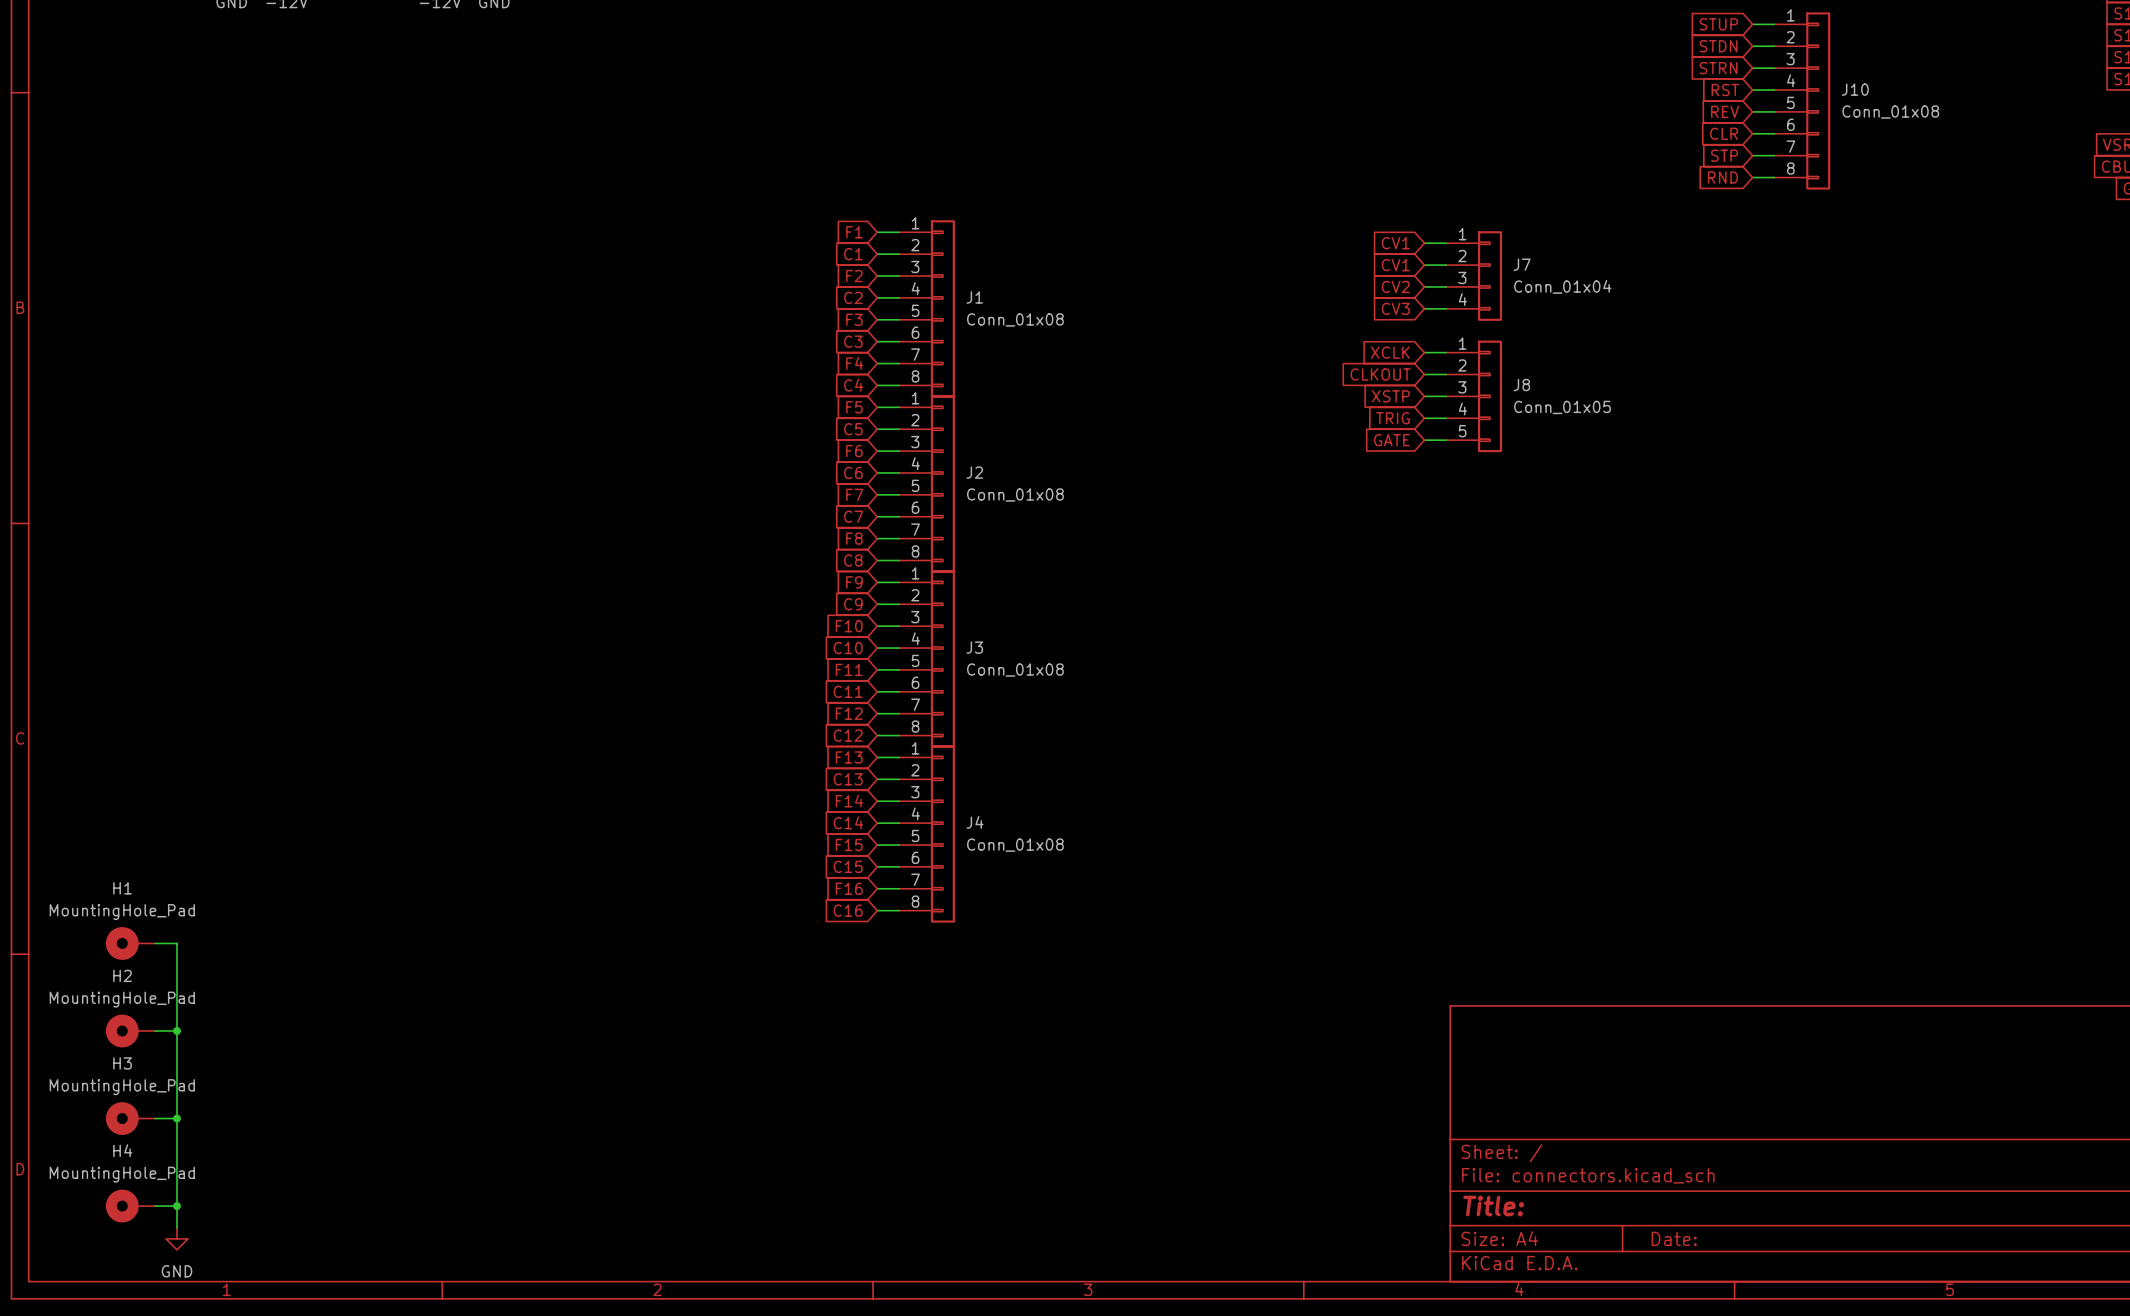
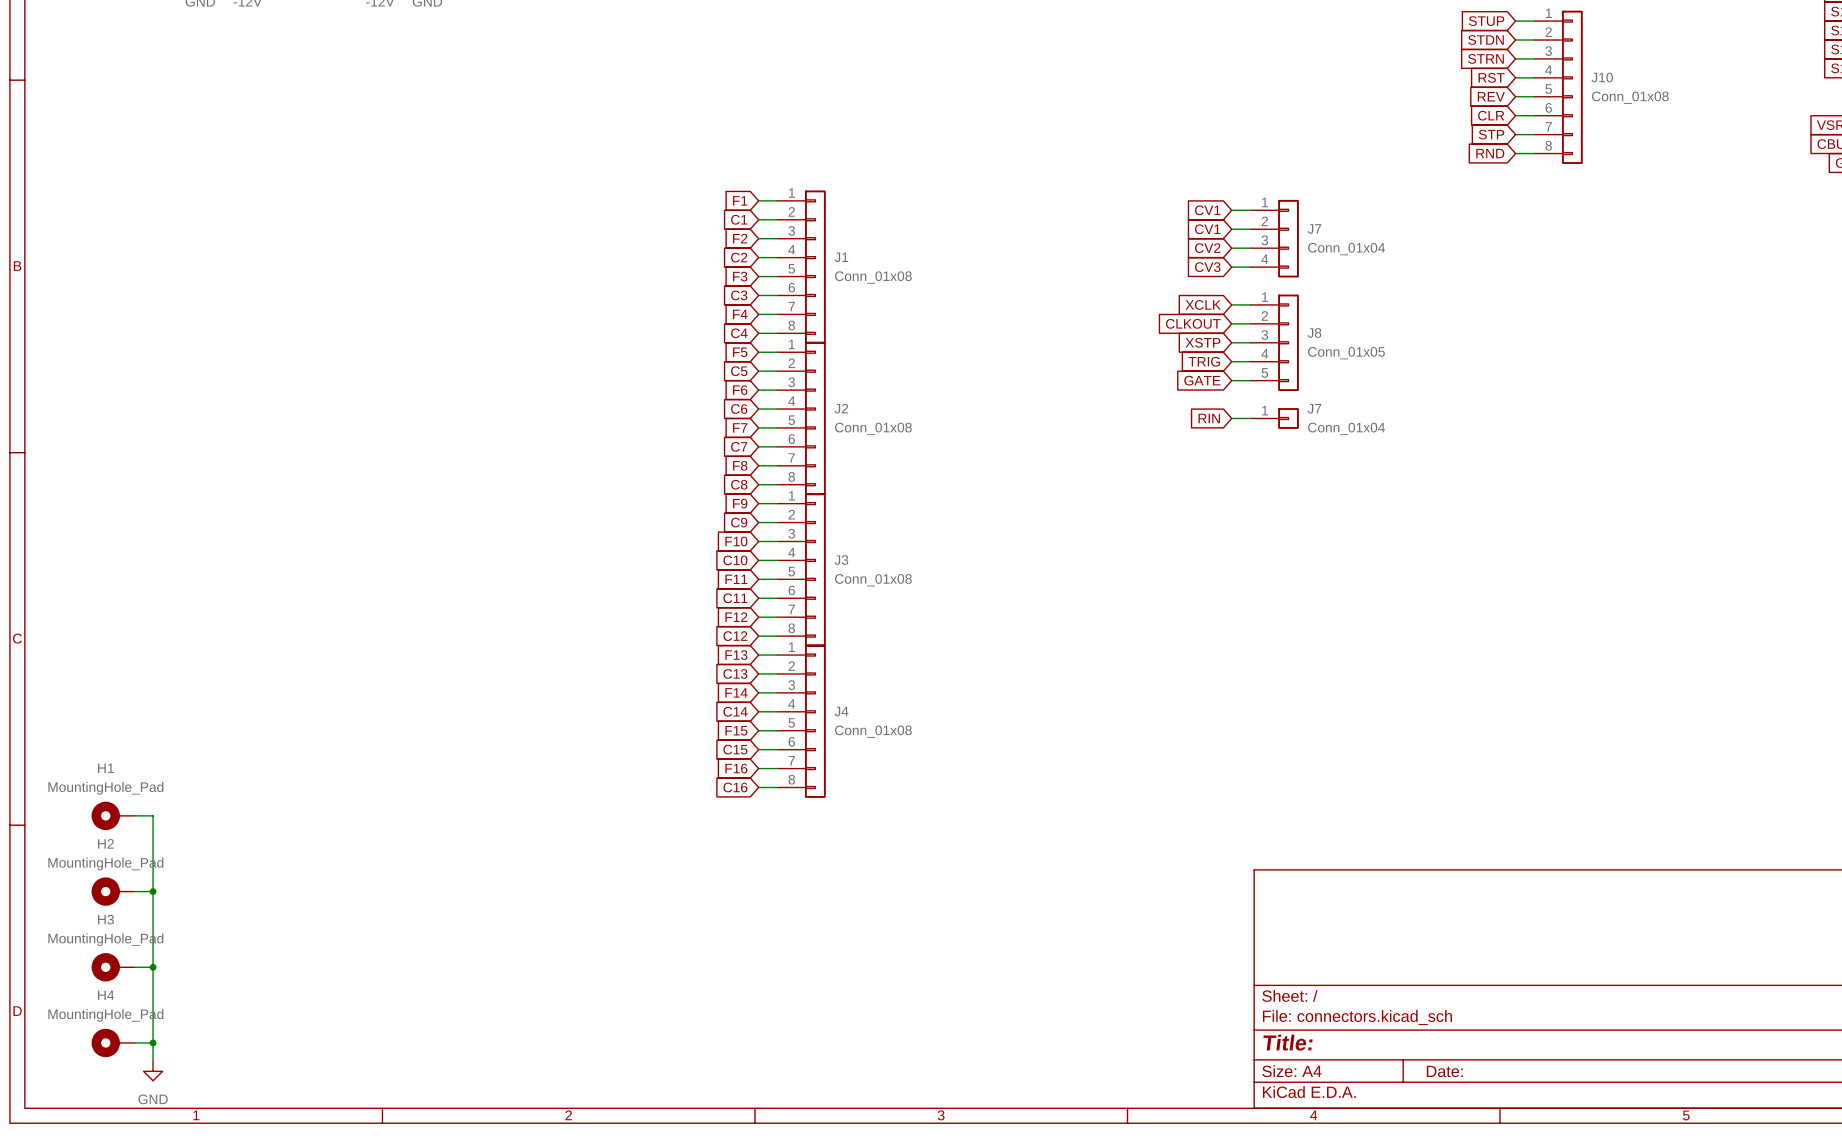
global label: none -> RIN (1209, 418)
wire: none -> (1231, 418) (1250, 418)
J7: none -> Conn_01x04 (1274, 418)

